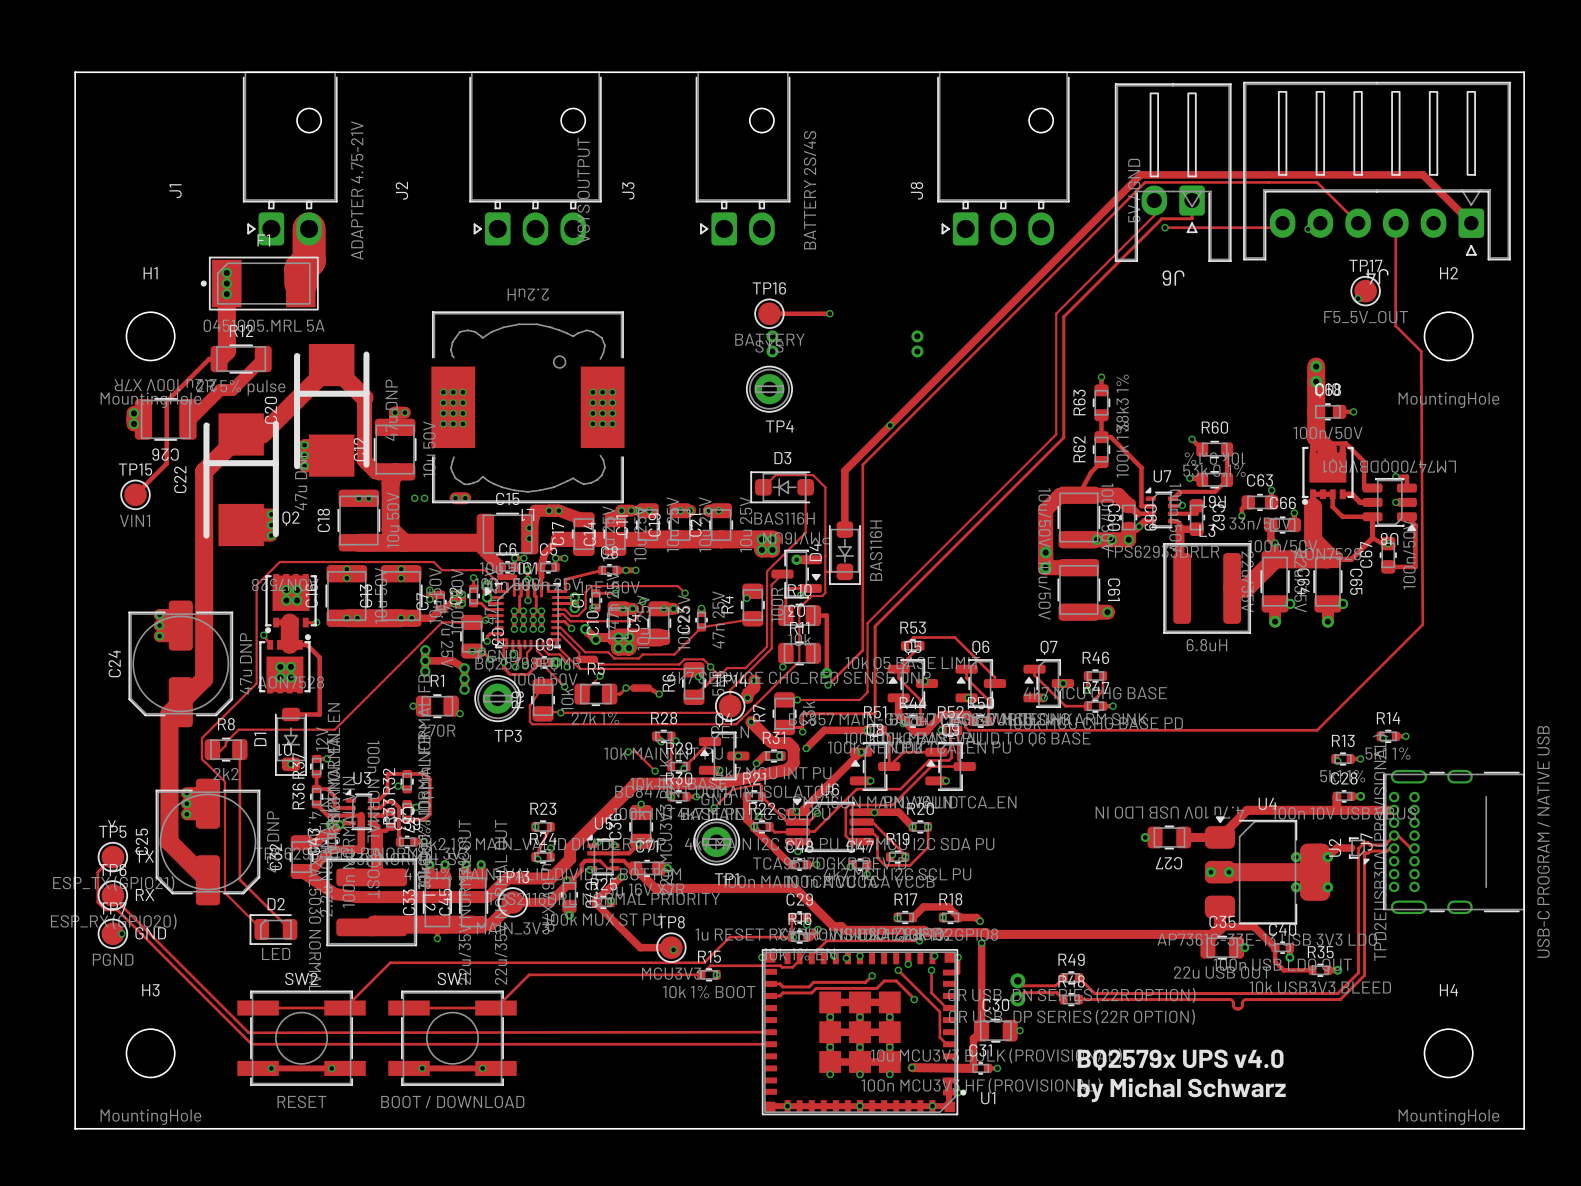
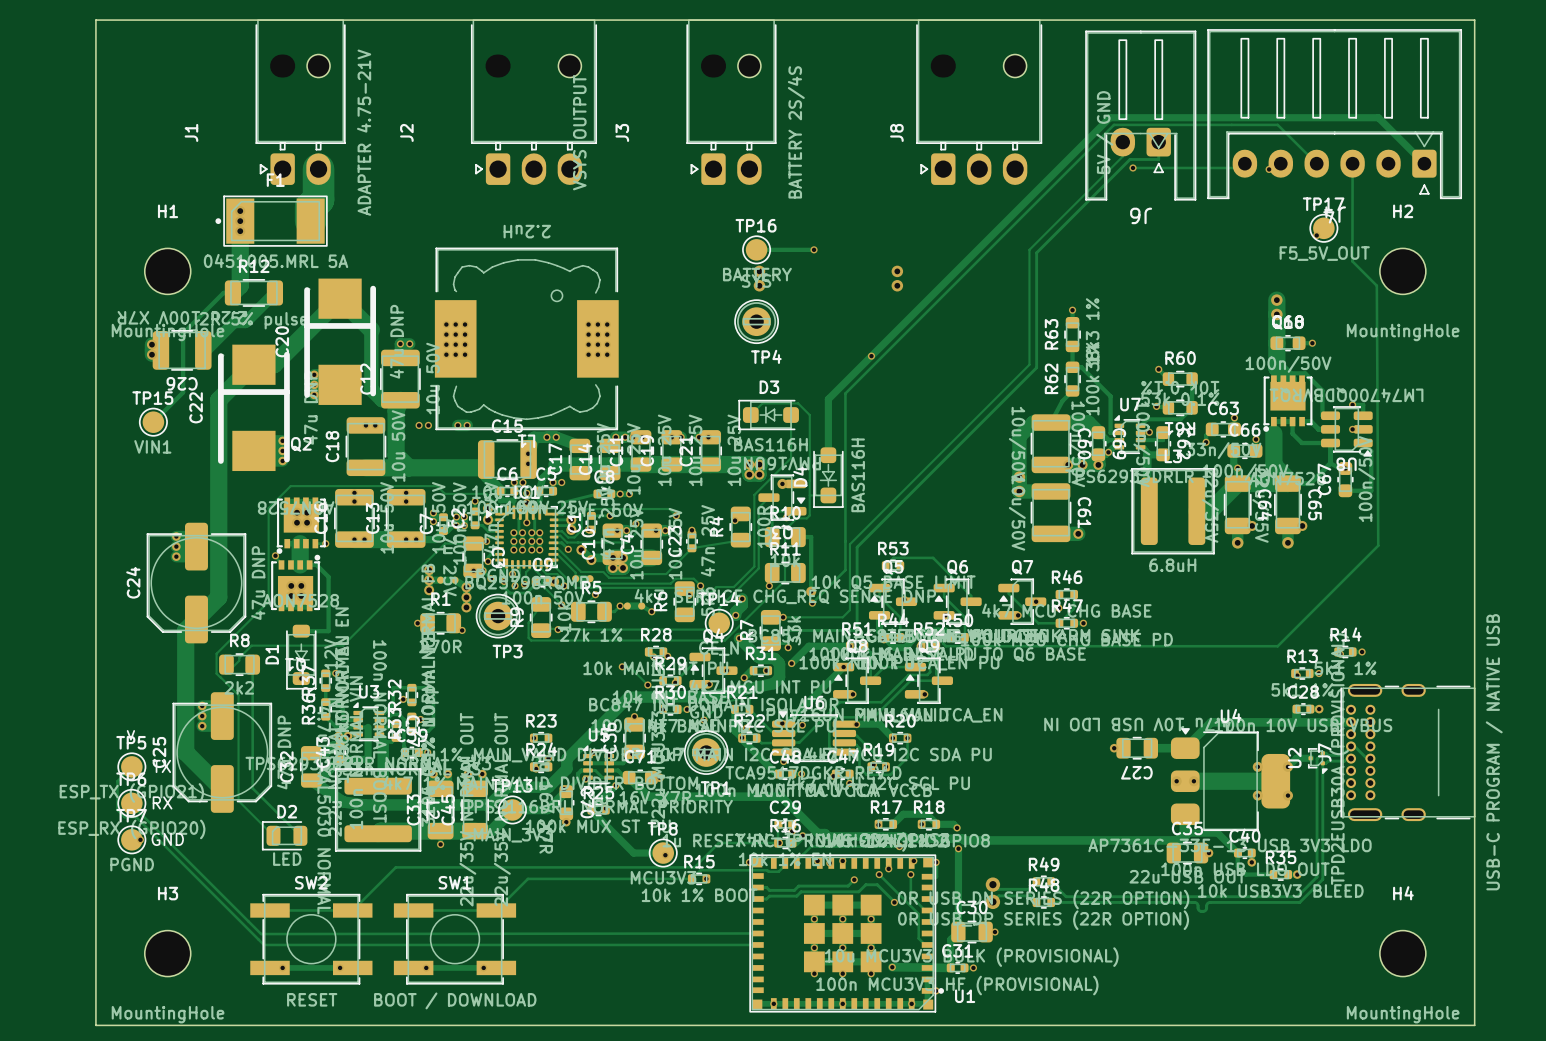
text: BQ2579x UPS v4.0 (1180, 1059) -> none
text: by Michal Schwarz (1181, 1090) -> none

